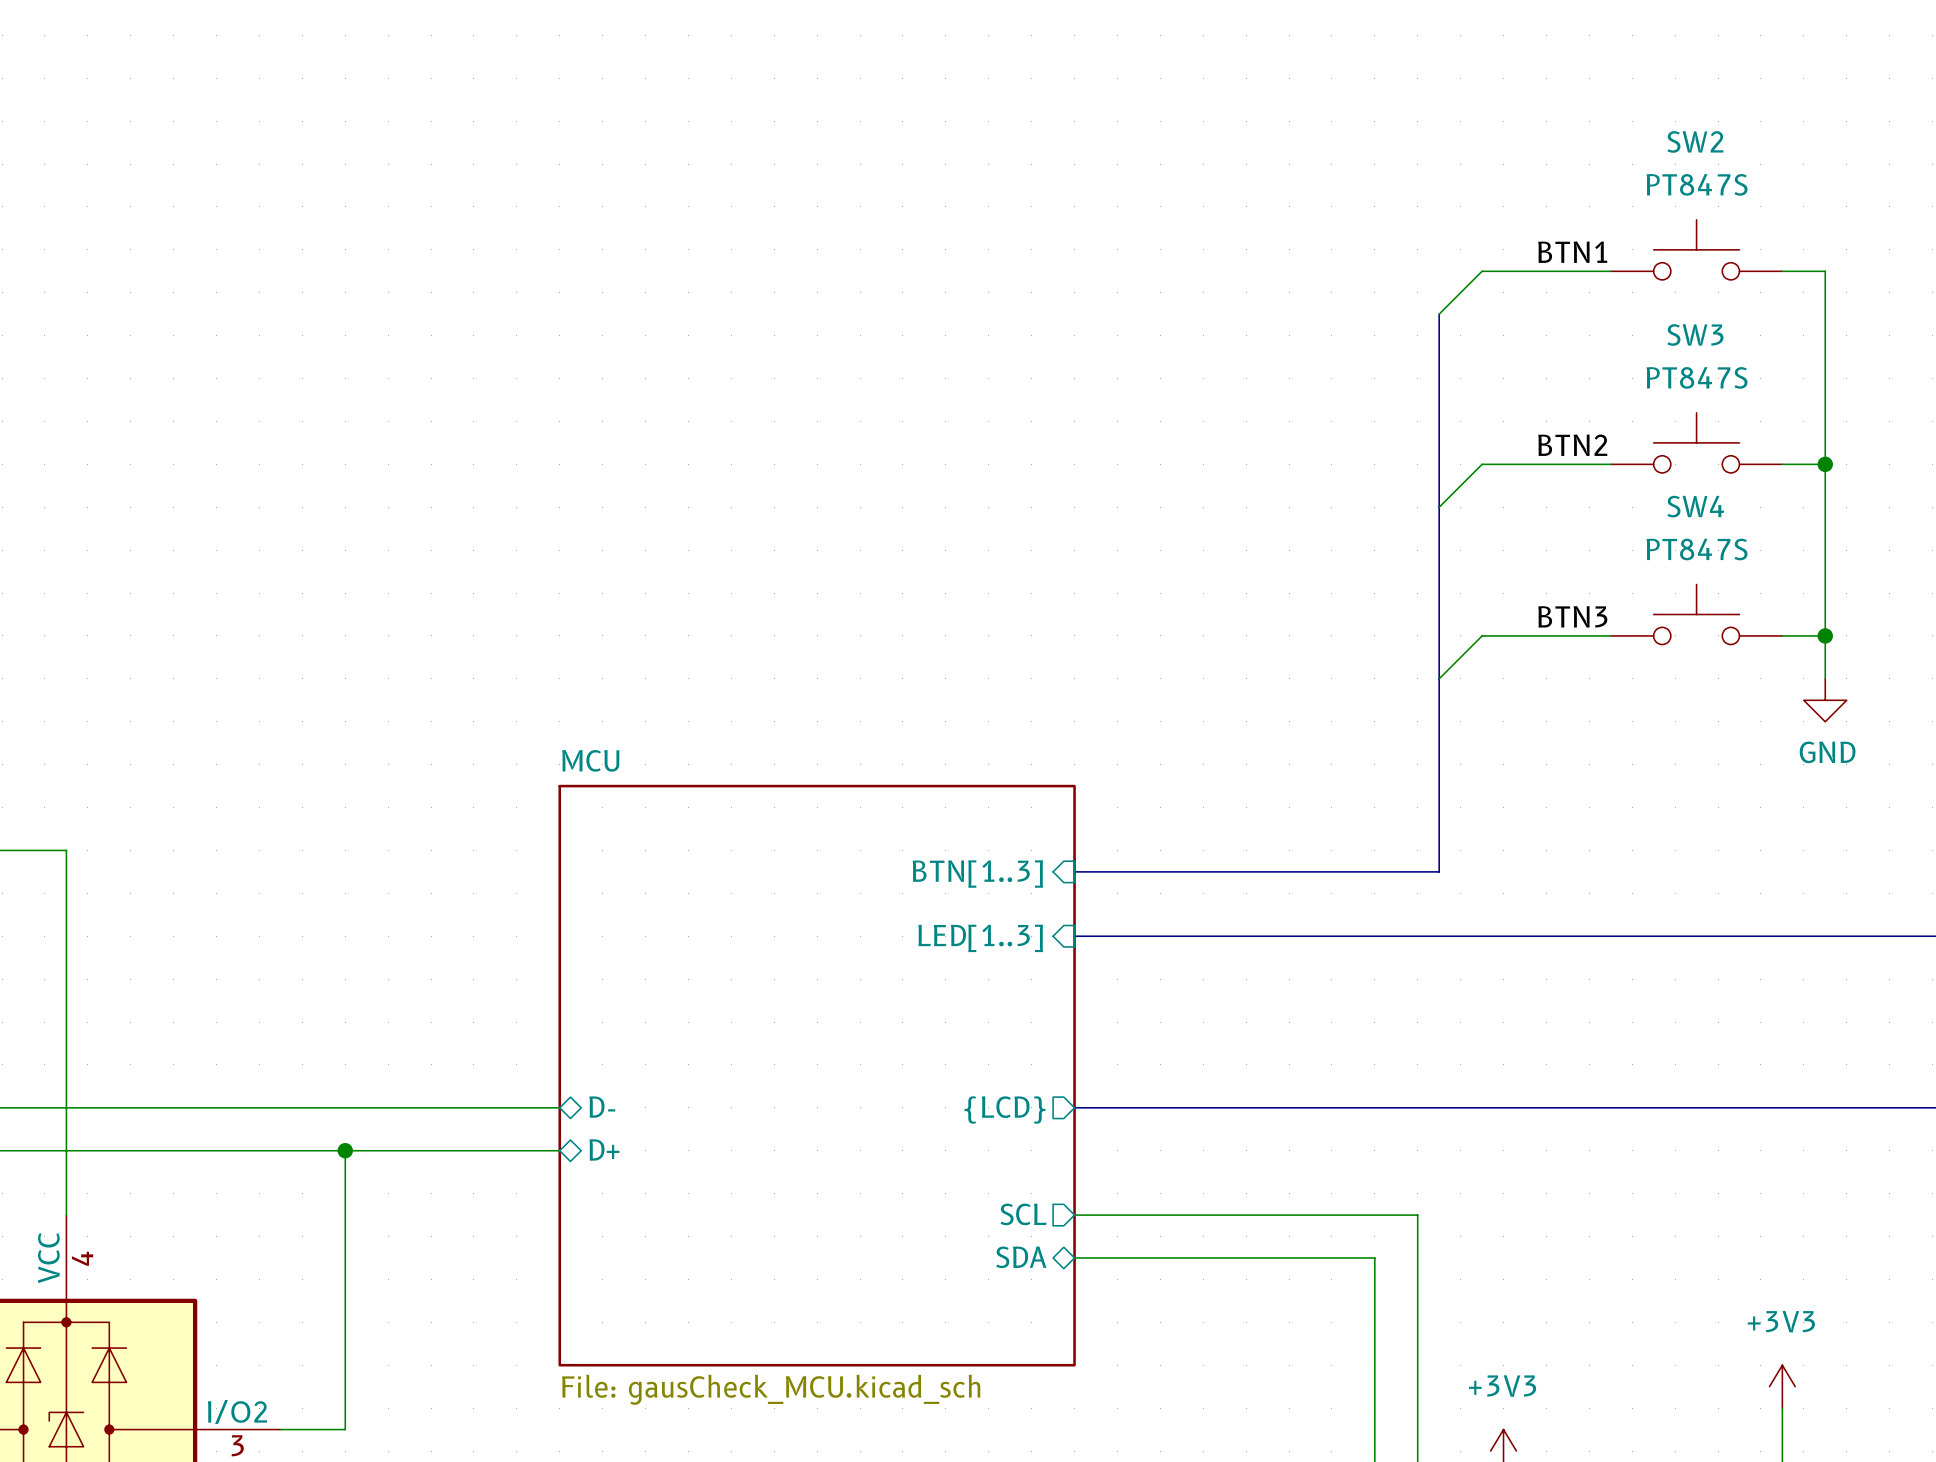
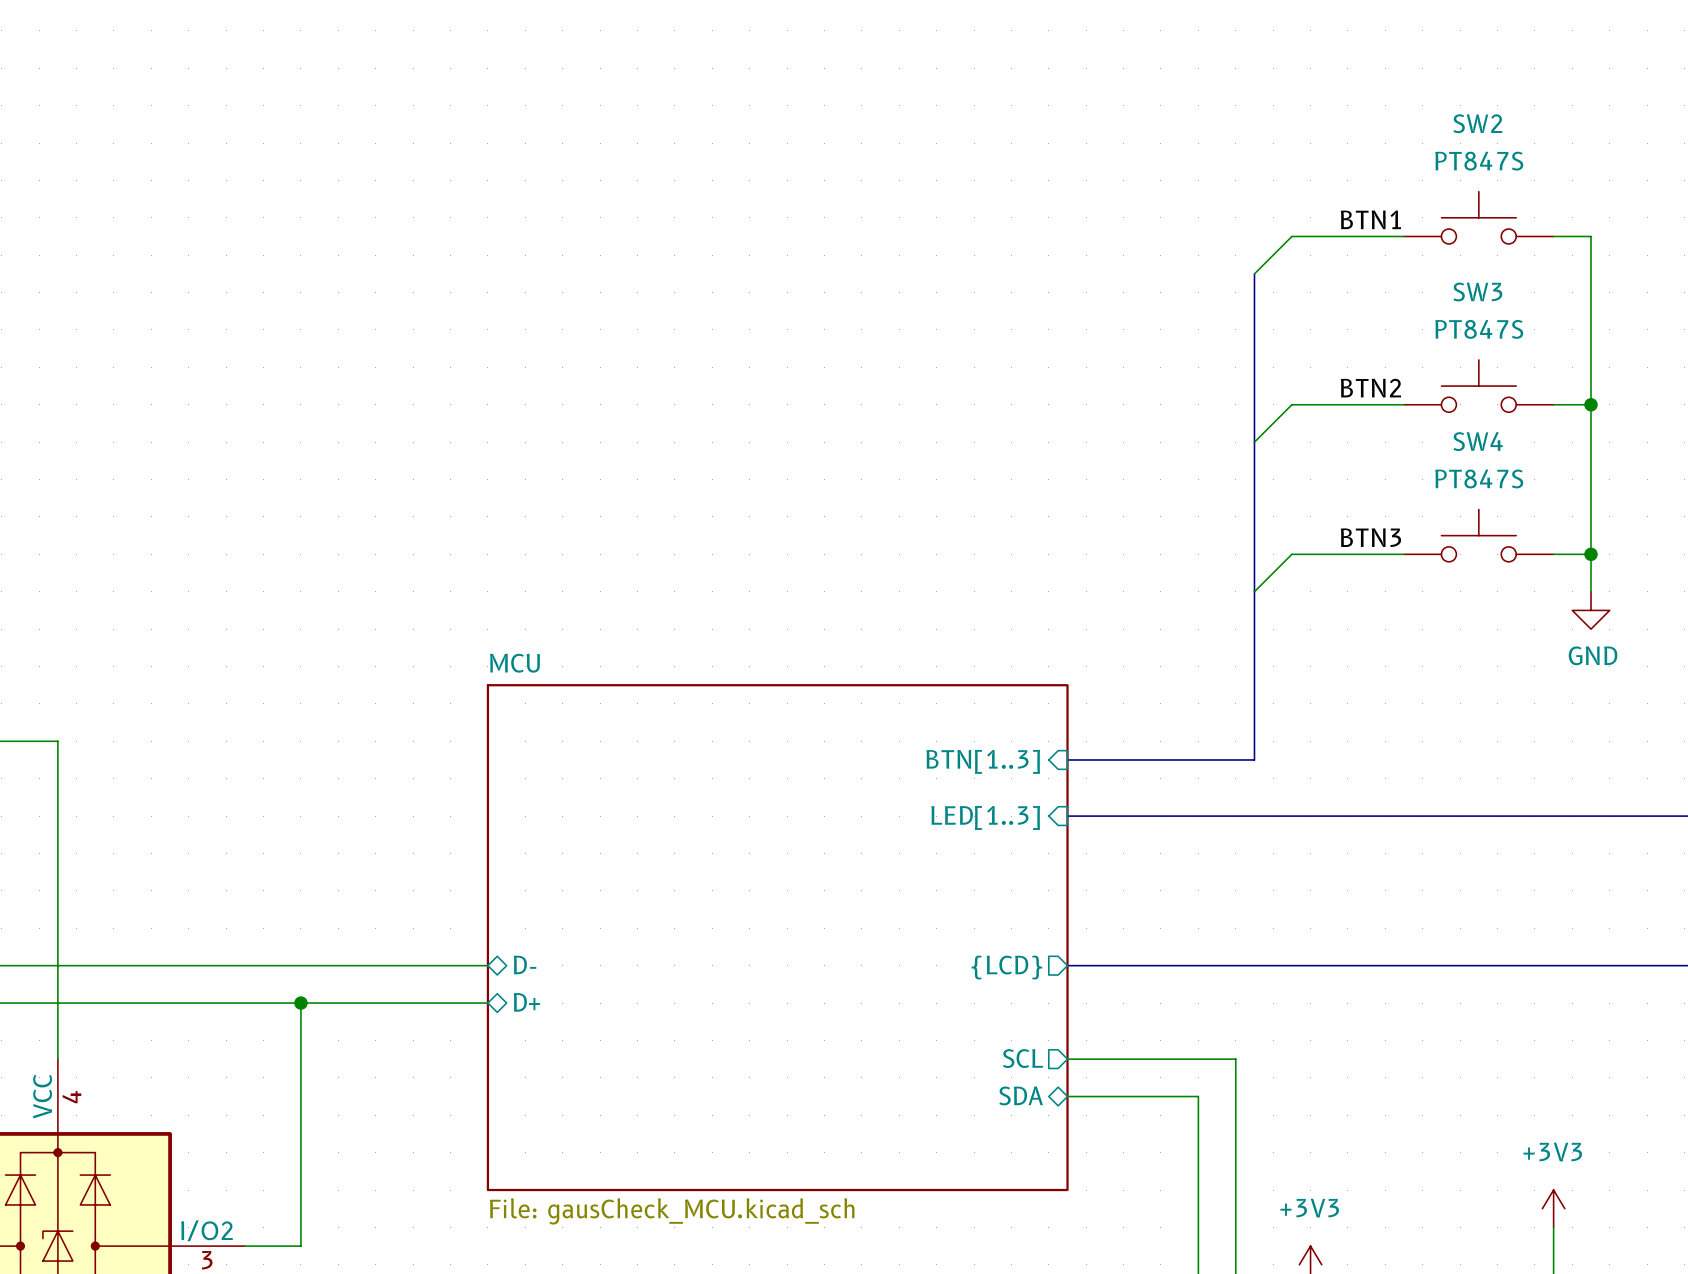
bus: (1074, 871) (1224, 871) -> none
sheet pin position: BTN[1..3] (977, 874) -> BTN[1..3] (983, 761)
bus: (1074, 936) (1224, 936) -> none
sheet pin position: LED[1..3] (980, 938) -> LED[1..3] (985, 817)
sheet MCU: File: gausCheck_MCU.kicad_sch (817, 1075) -> none
sheet MCU: none -> File: gausCheck_MCU.kicad_sch (777, 937)
bus: (1074, 1107) (1224, 1107) -> none
sheet pin position: {LCD} (1004, 1109) -> {LCD} (1006, 967)
sheet pin position: SCL (1023, 1214) -> SCL (1022, 1058)
wire: (1074, 1215) (1224, 1215) -> none
sheet pin position: SDA (1021, 1257) -> SDA (1021, 1095)
wire: (1074, 1257) (1224, 1257) -> none

